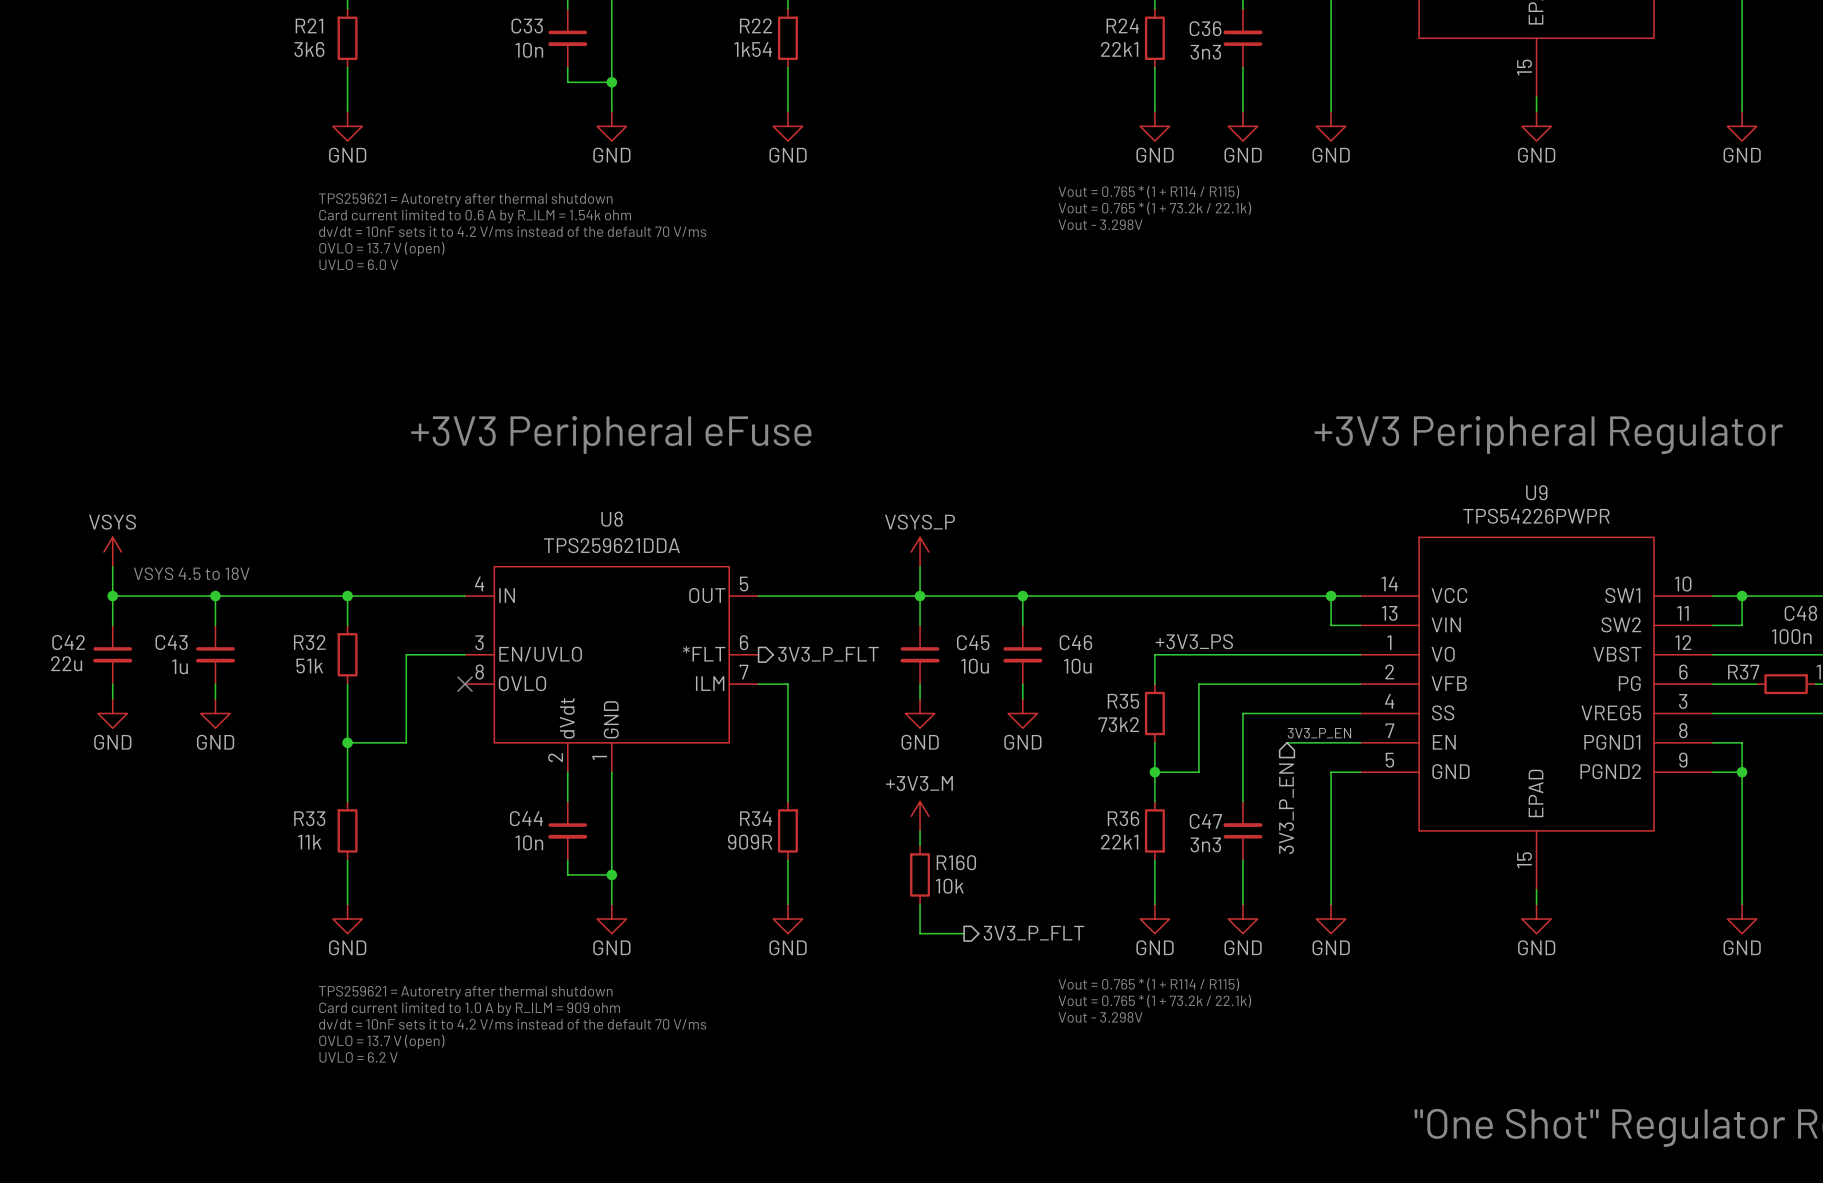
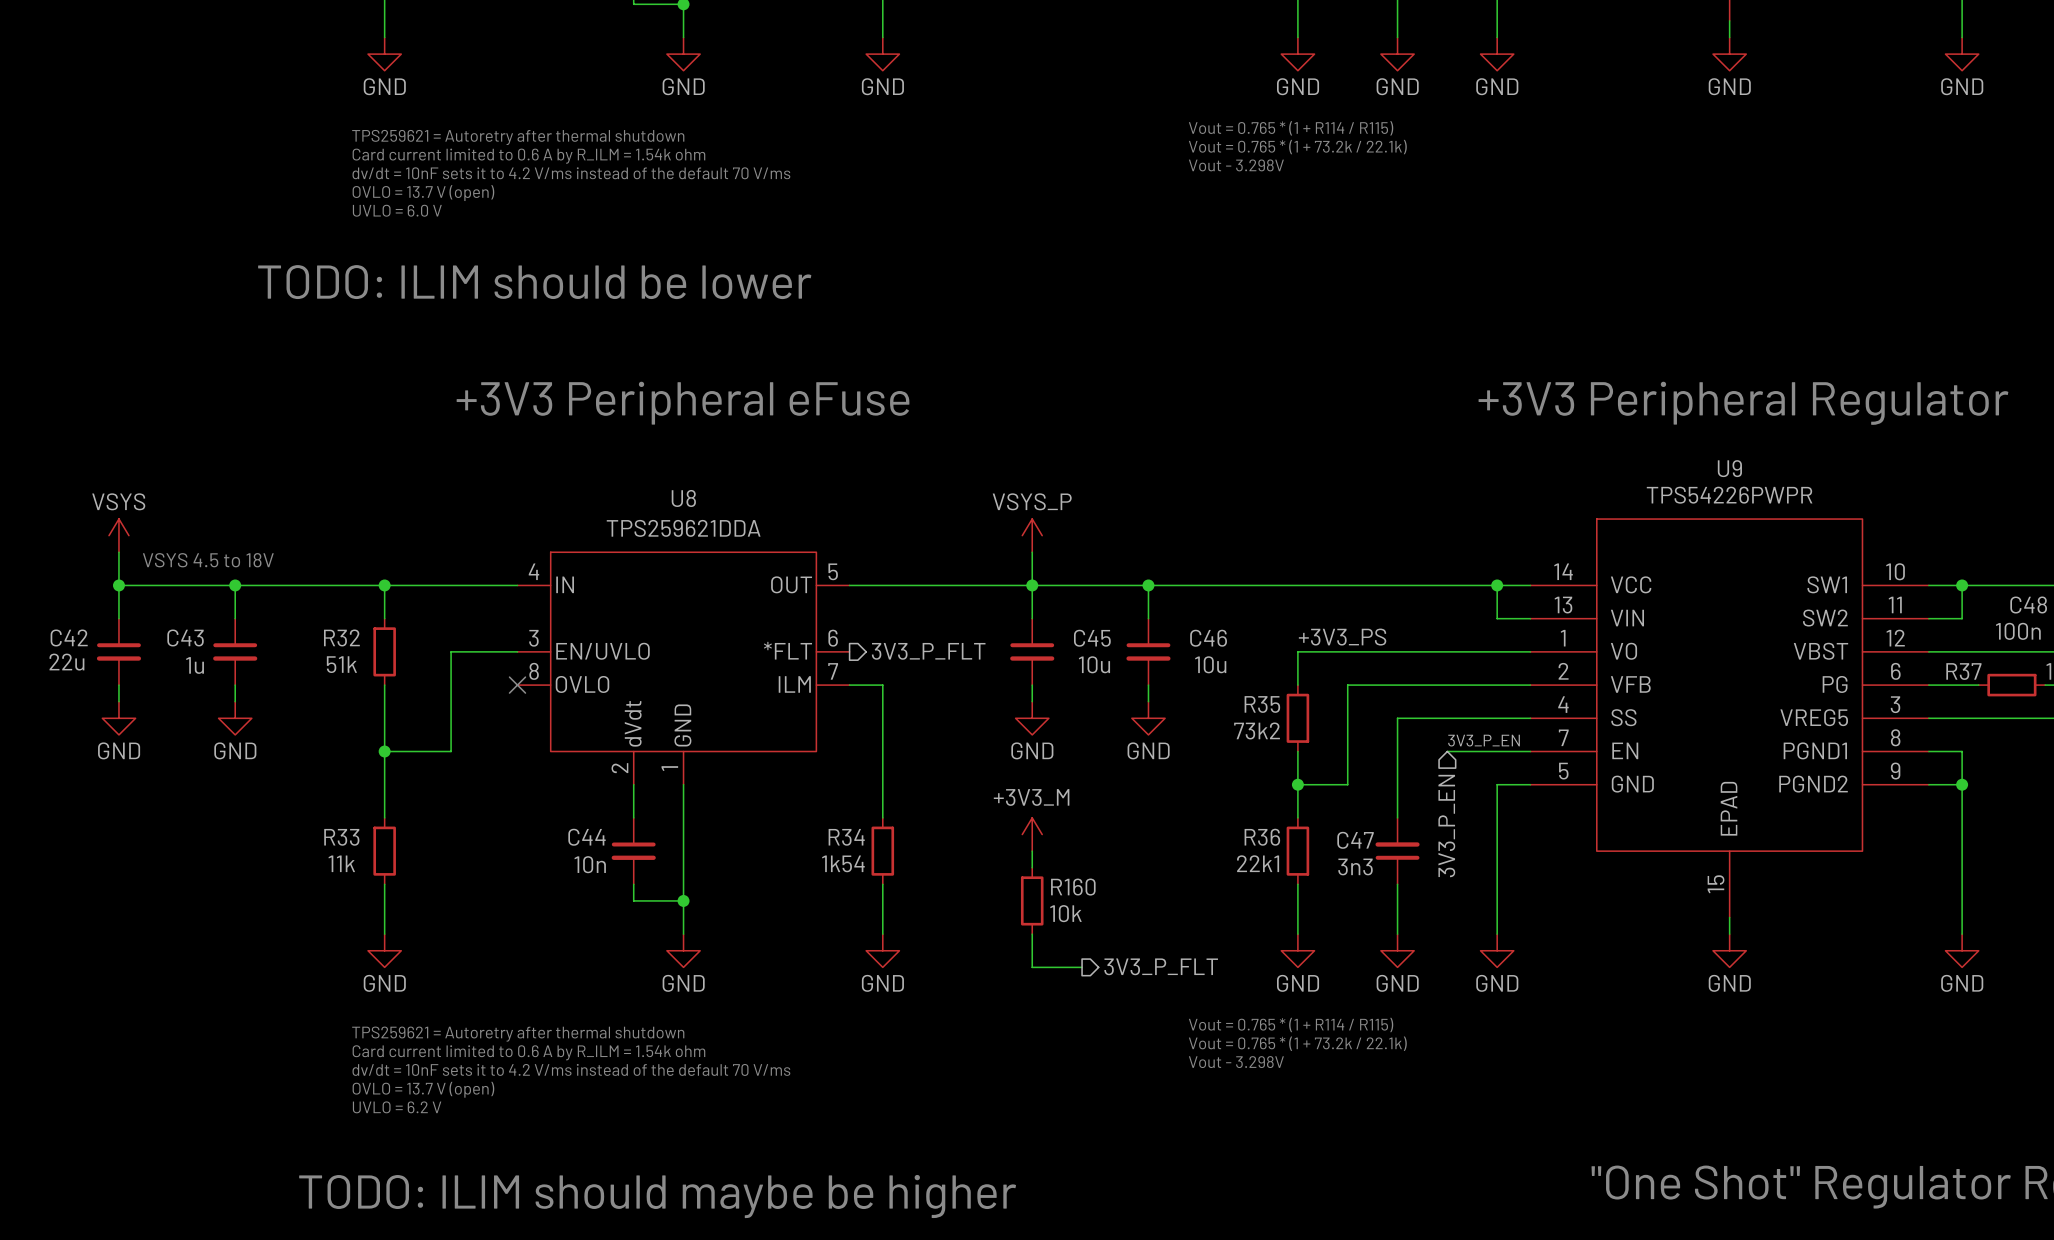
text: none -> TODO: ILIM should be lower (534, 282)
R34 value: 909R (750, 842) -> 1k54 (843, 863)
text: Card current limited to 1.0 A by R_ILM = 909 ohm (469, 1009) -> Card current limited to 0.6 A by R_ILM = 1.54k ohm (528, 1052)
text: none -> TODO: ILIM should maybe be higher (657, 1196)

